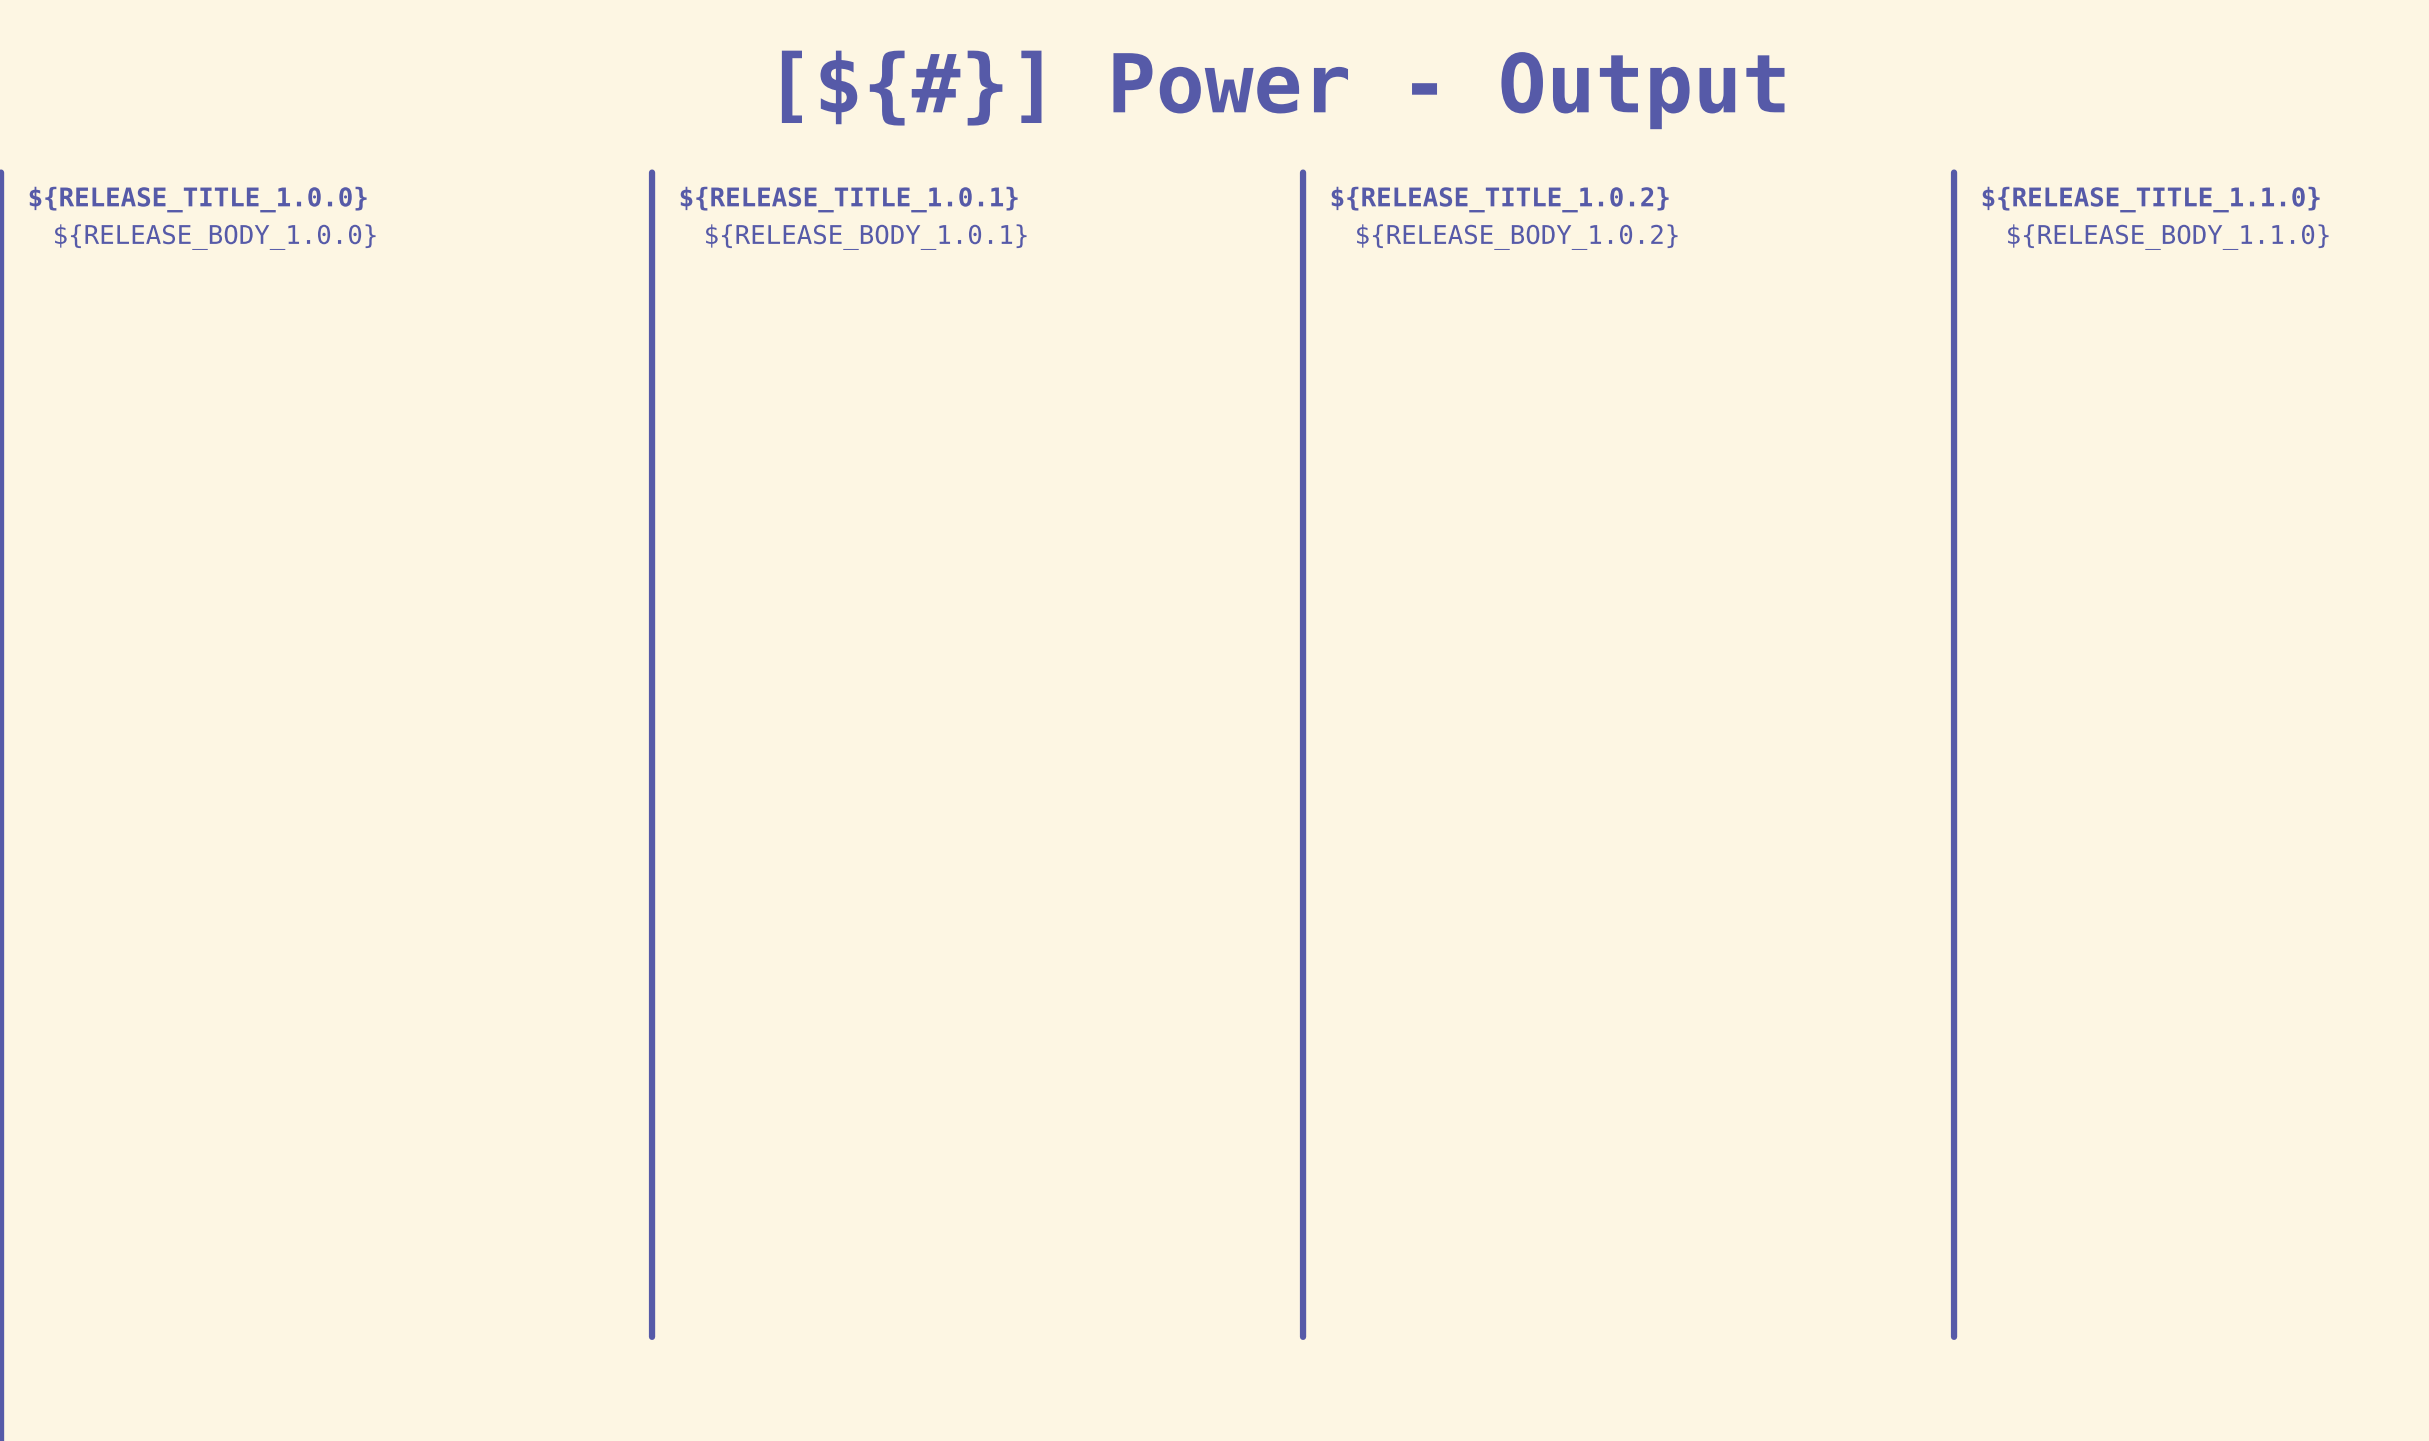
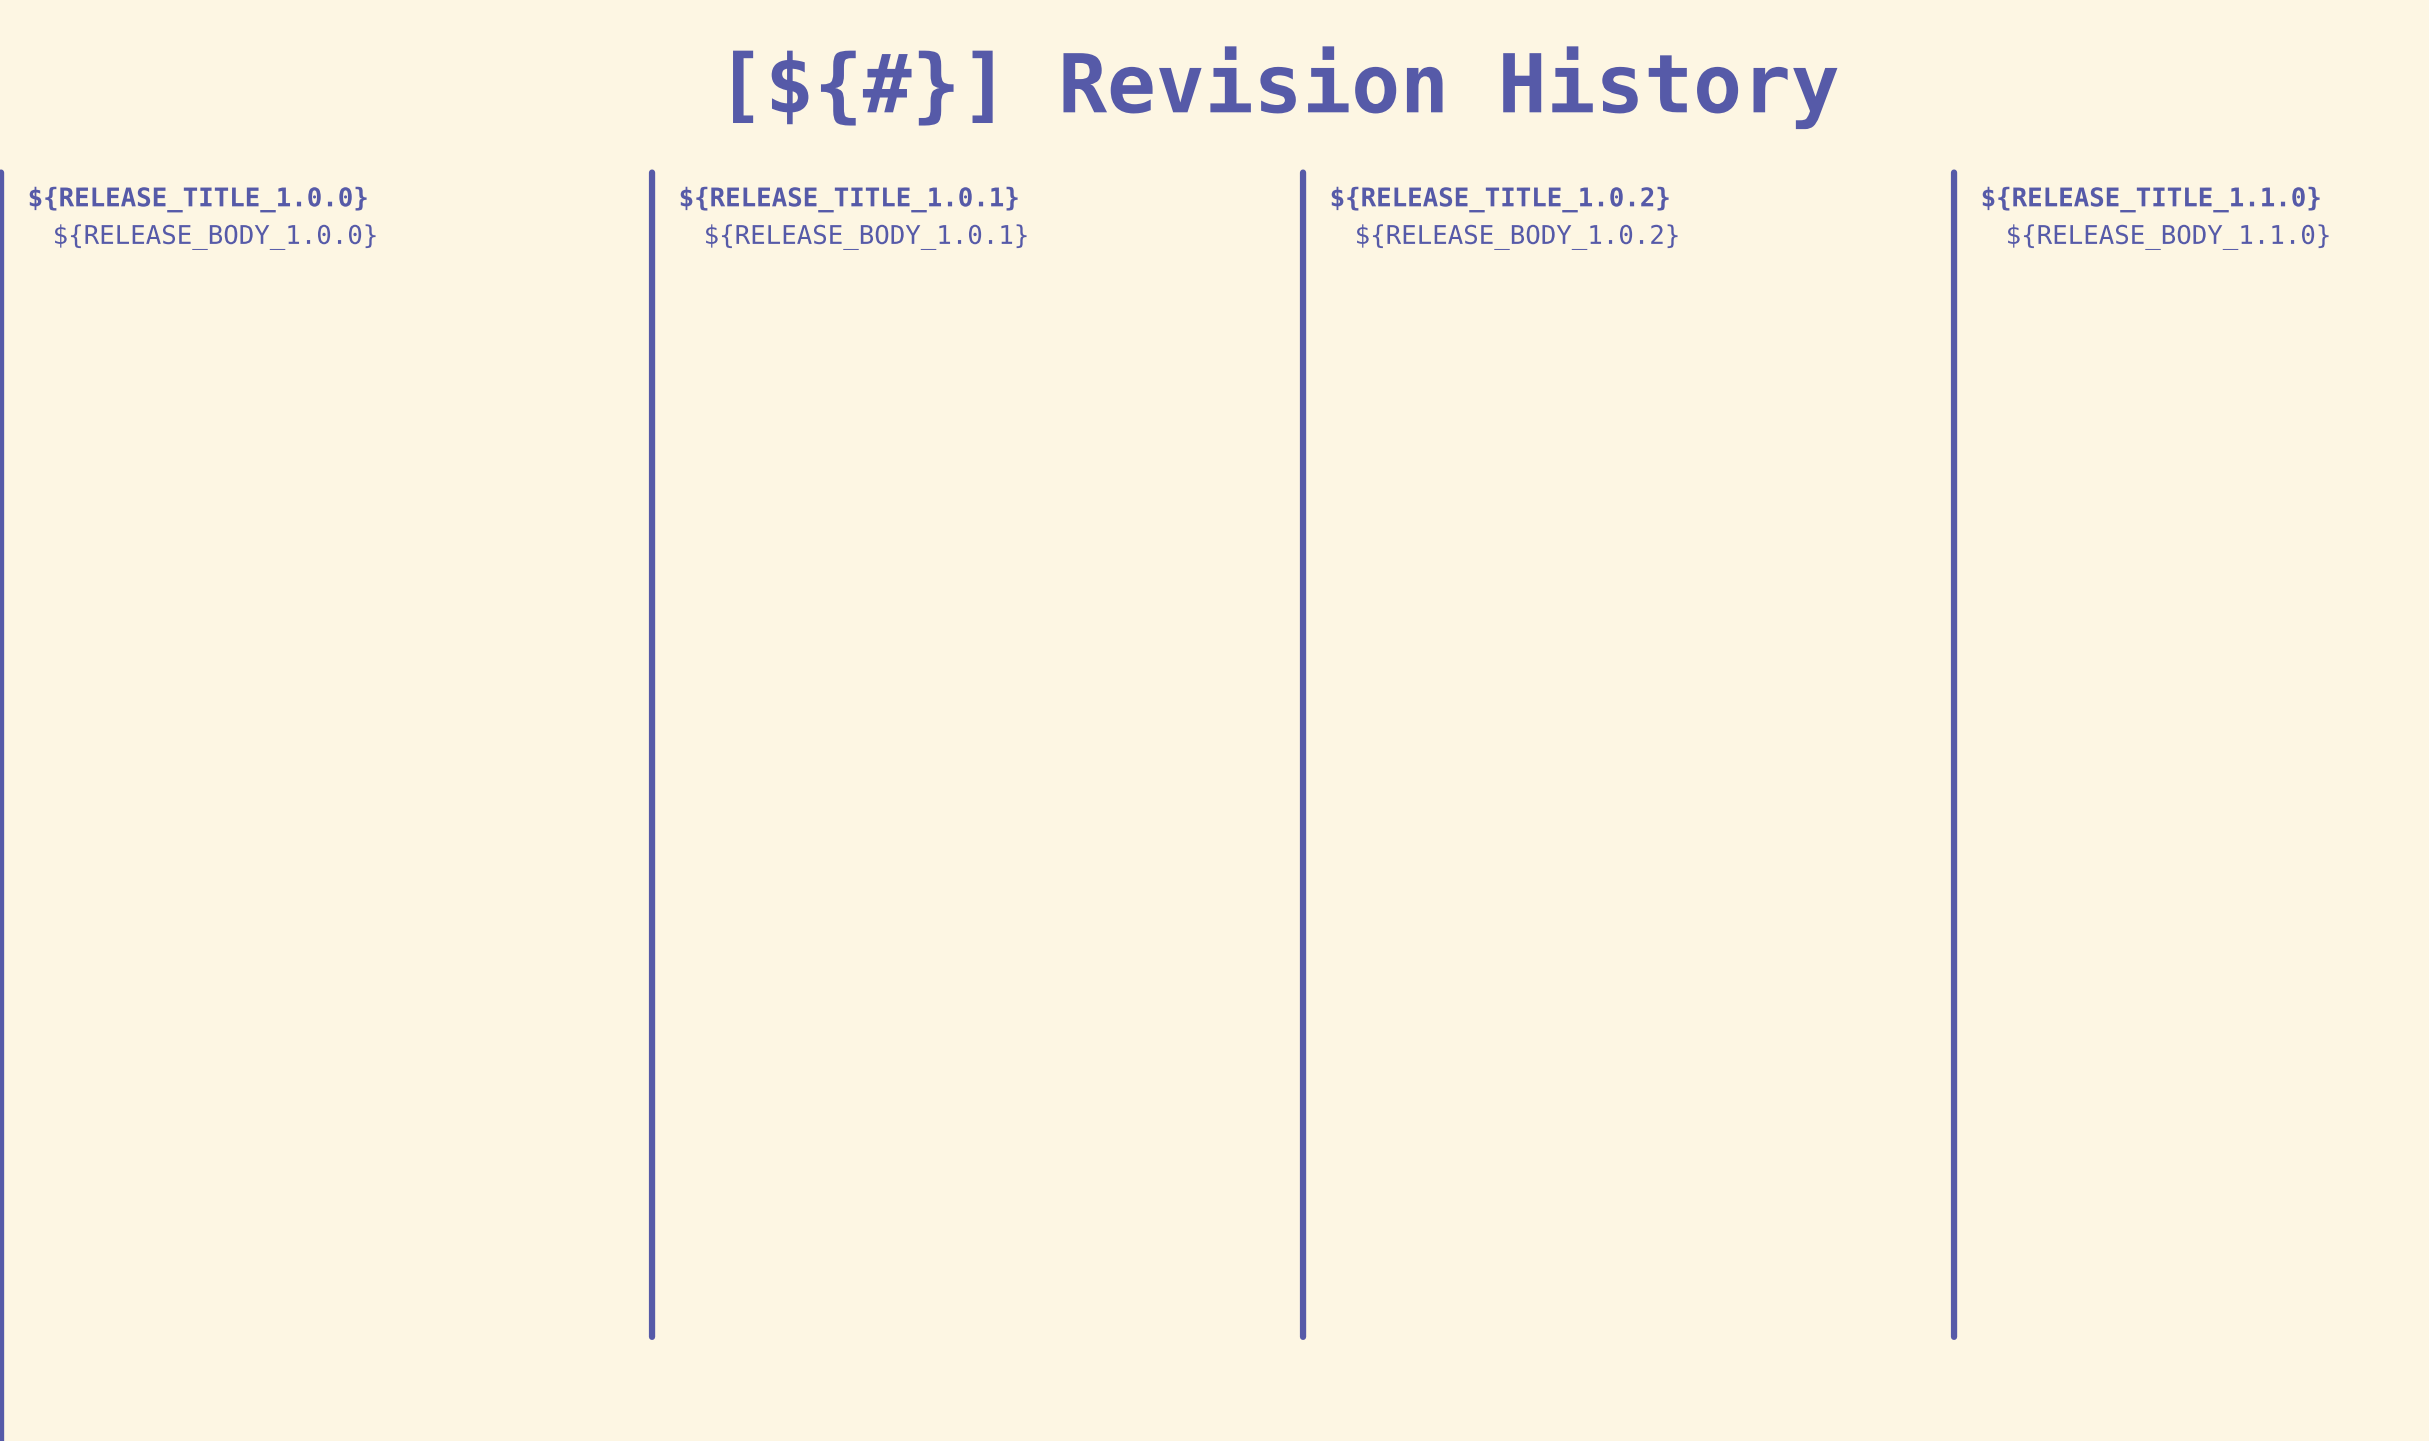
text: [${#}] Power - Output (1283, 89) -> [${#}] Revision History (1285, 87)

